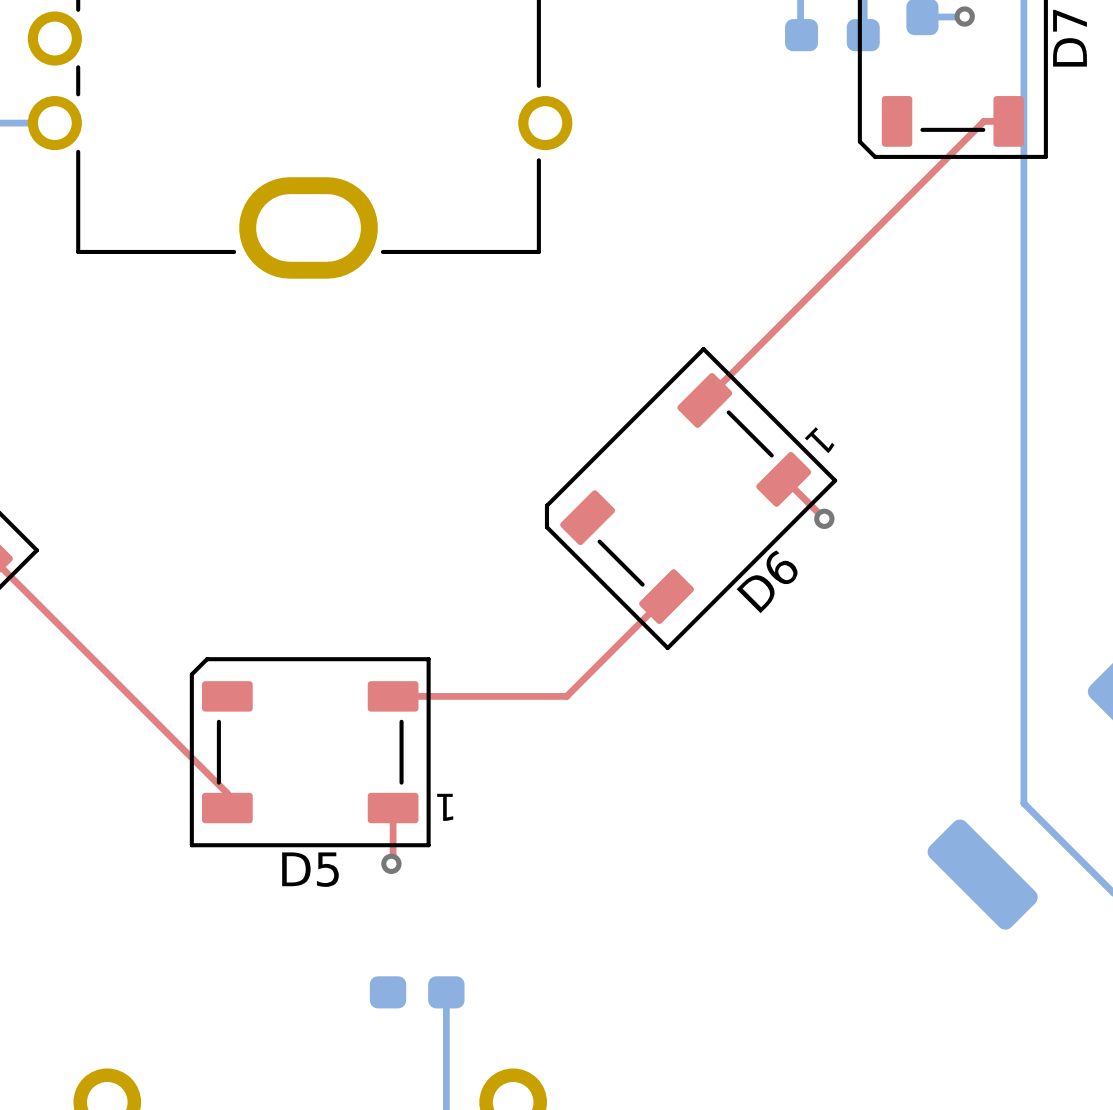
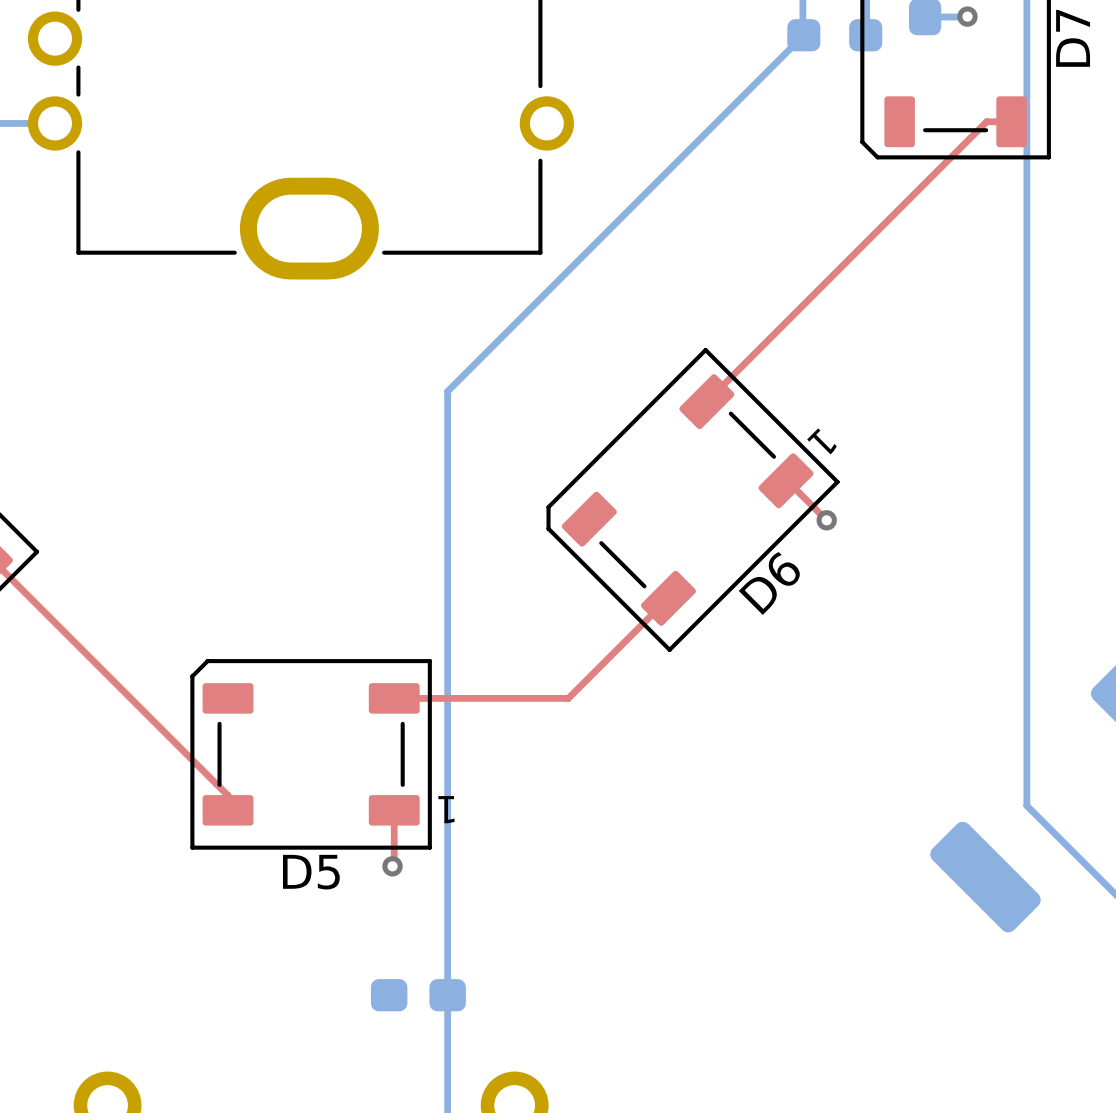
bottom track: none -> (803, 35) (447, 391) (447, 995)

